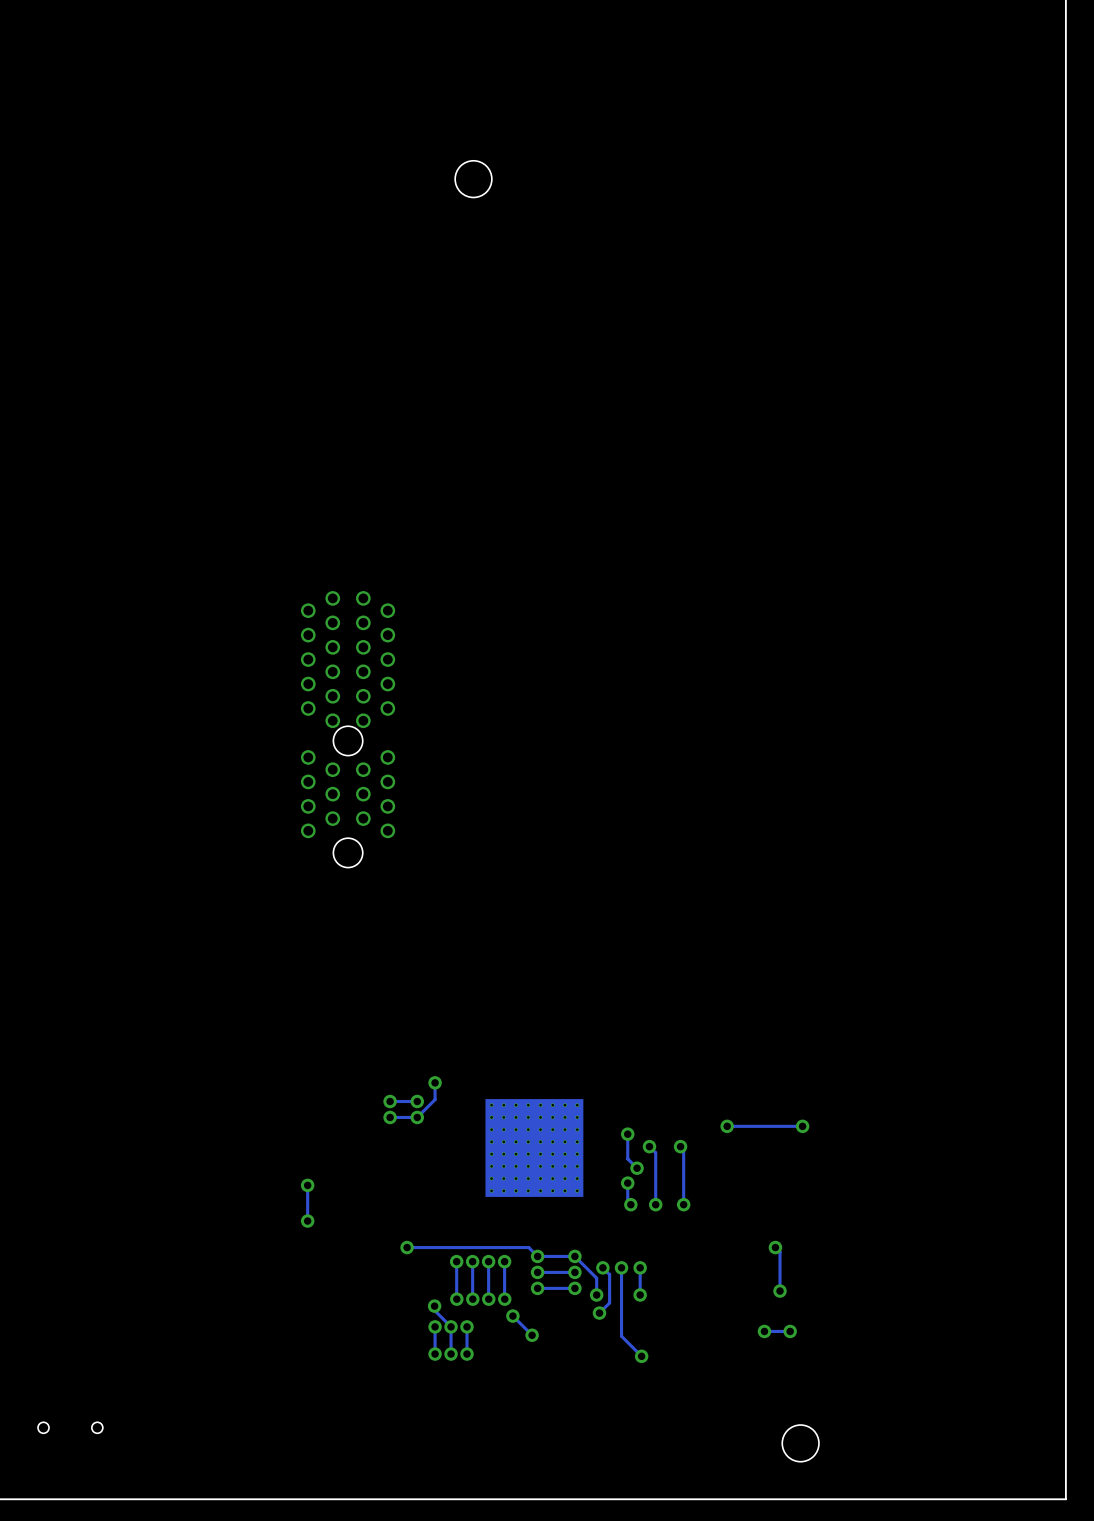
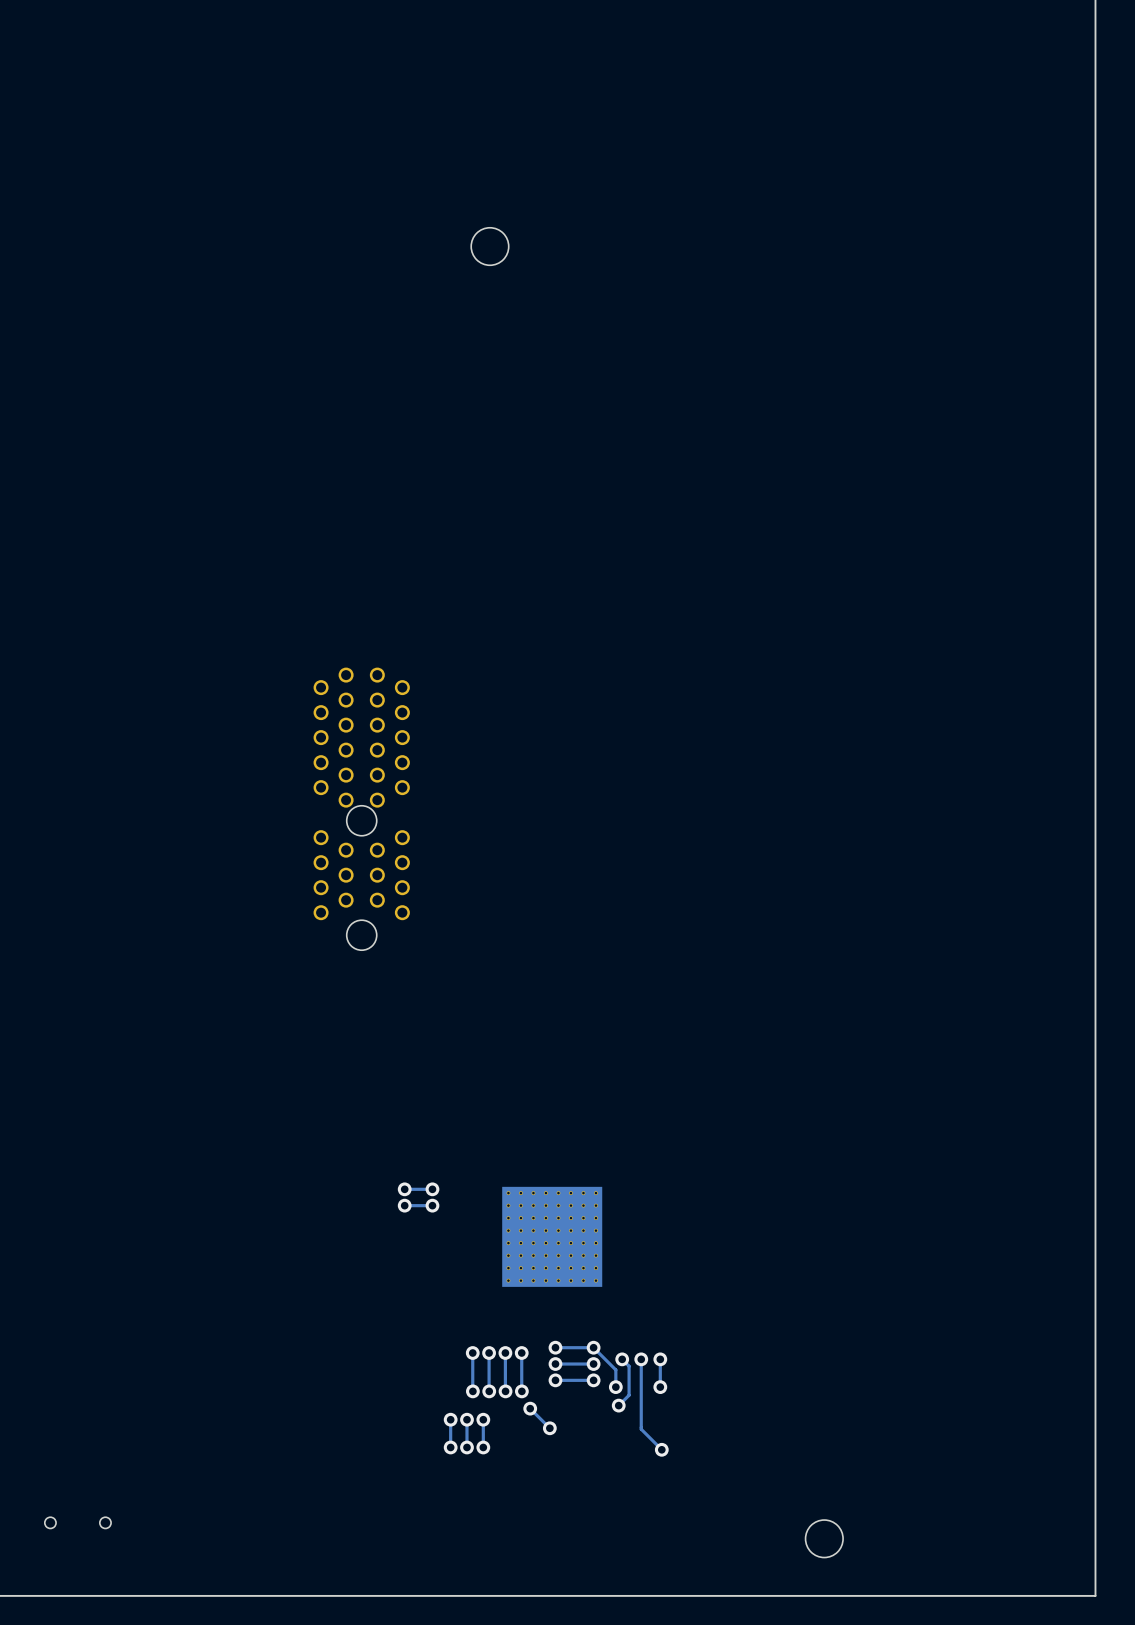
track: (435, 1082) (435, 1099) (417, 1117) -> none
via: (435, 1082) -> none
via: (727, 1126) -> none
track: (802, 1126) (727, 1126) -> none
via: (802, 1126) -> none
track: (627, 1134) (627, 1158) (637, 1168) -> none
via: (627, 1134) -> none
track: (649, 1146) (655, 1152) (655, 1204) -> none
via: (649, 1146) -> none
track: (680, 1146) (683, 1149) (683, 1204) -> none
via: (680, 1146) -> none
via: (637, 1168) -> none
track: (627, 1183) (627, 1204) -> none
via: (627, 1183) -> none
track: (307, 1185) (307, 1221) -> none
via: (307, 1185) -> none
via: (630, 1204) -> none
via: (655, 1204) -> none
via: (683, 1204) -> none
via: (307, 1221) -> none
track: (407, 1247) (528, 1247) (537, 1256) -> none
via: (407, 1247) -> none
track: (775, 1247) (780, 1252) (780, 1291) -> none
via: (775, 1247) -> none
via: (780, 1291) -> none
track: (434, 1306) (434, 1310) (451, 1326) -> none
via: (434, 1306) -> none
via: (764, 1331) -> none
track: (790, 1331) (764, 1331) -> none
via: (790, 1331) -> none

